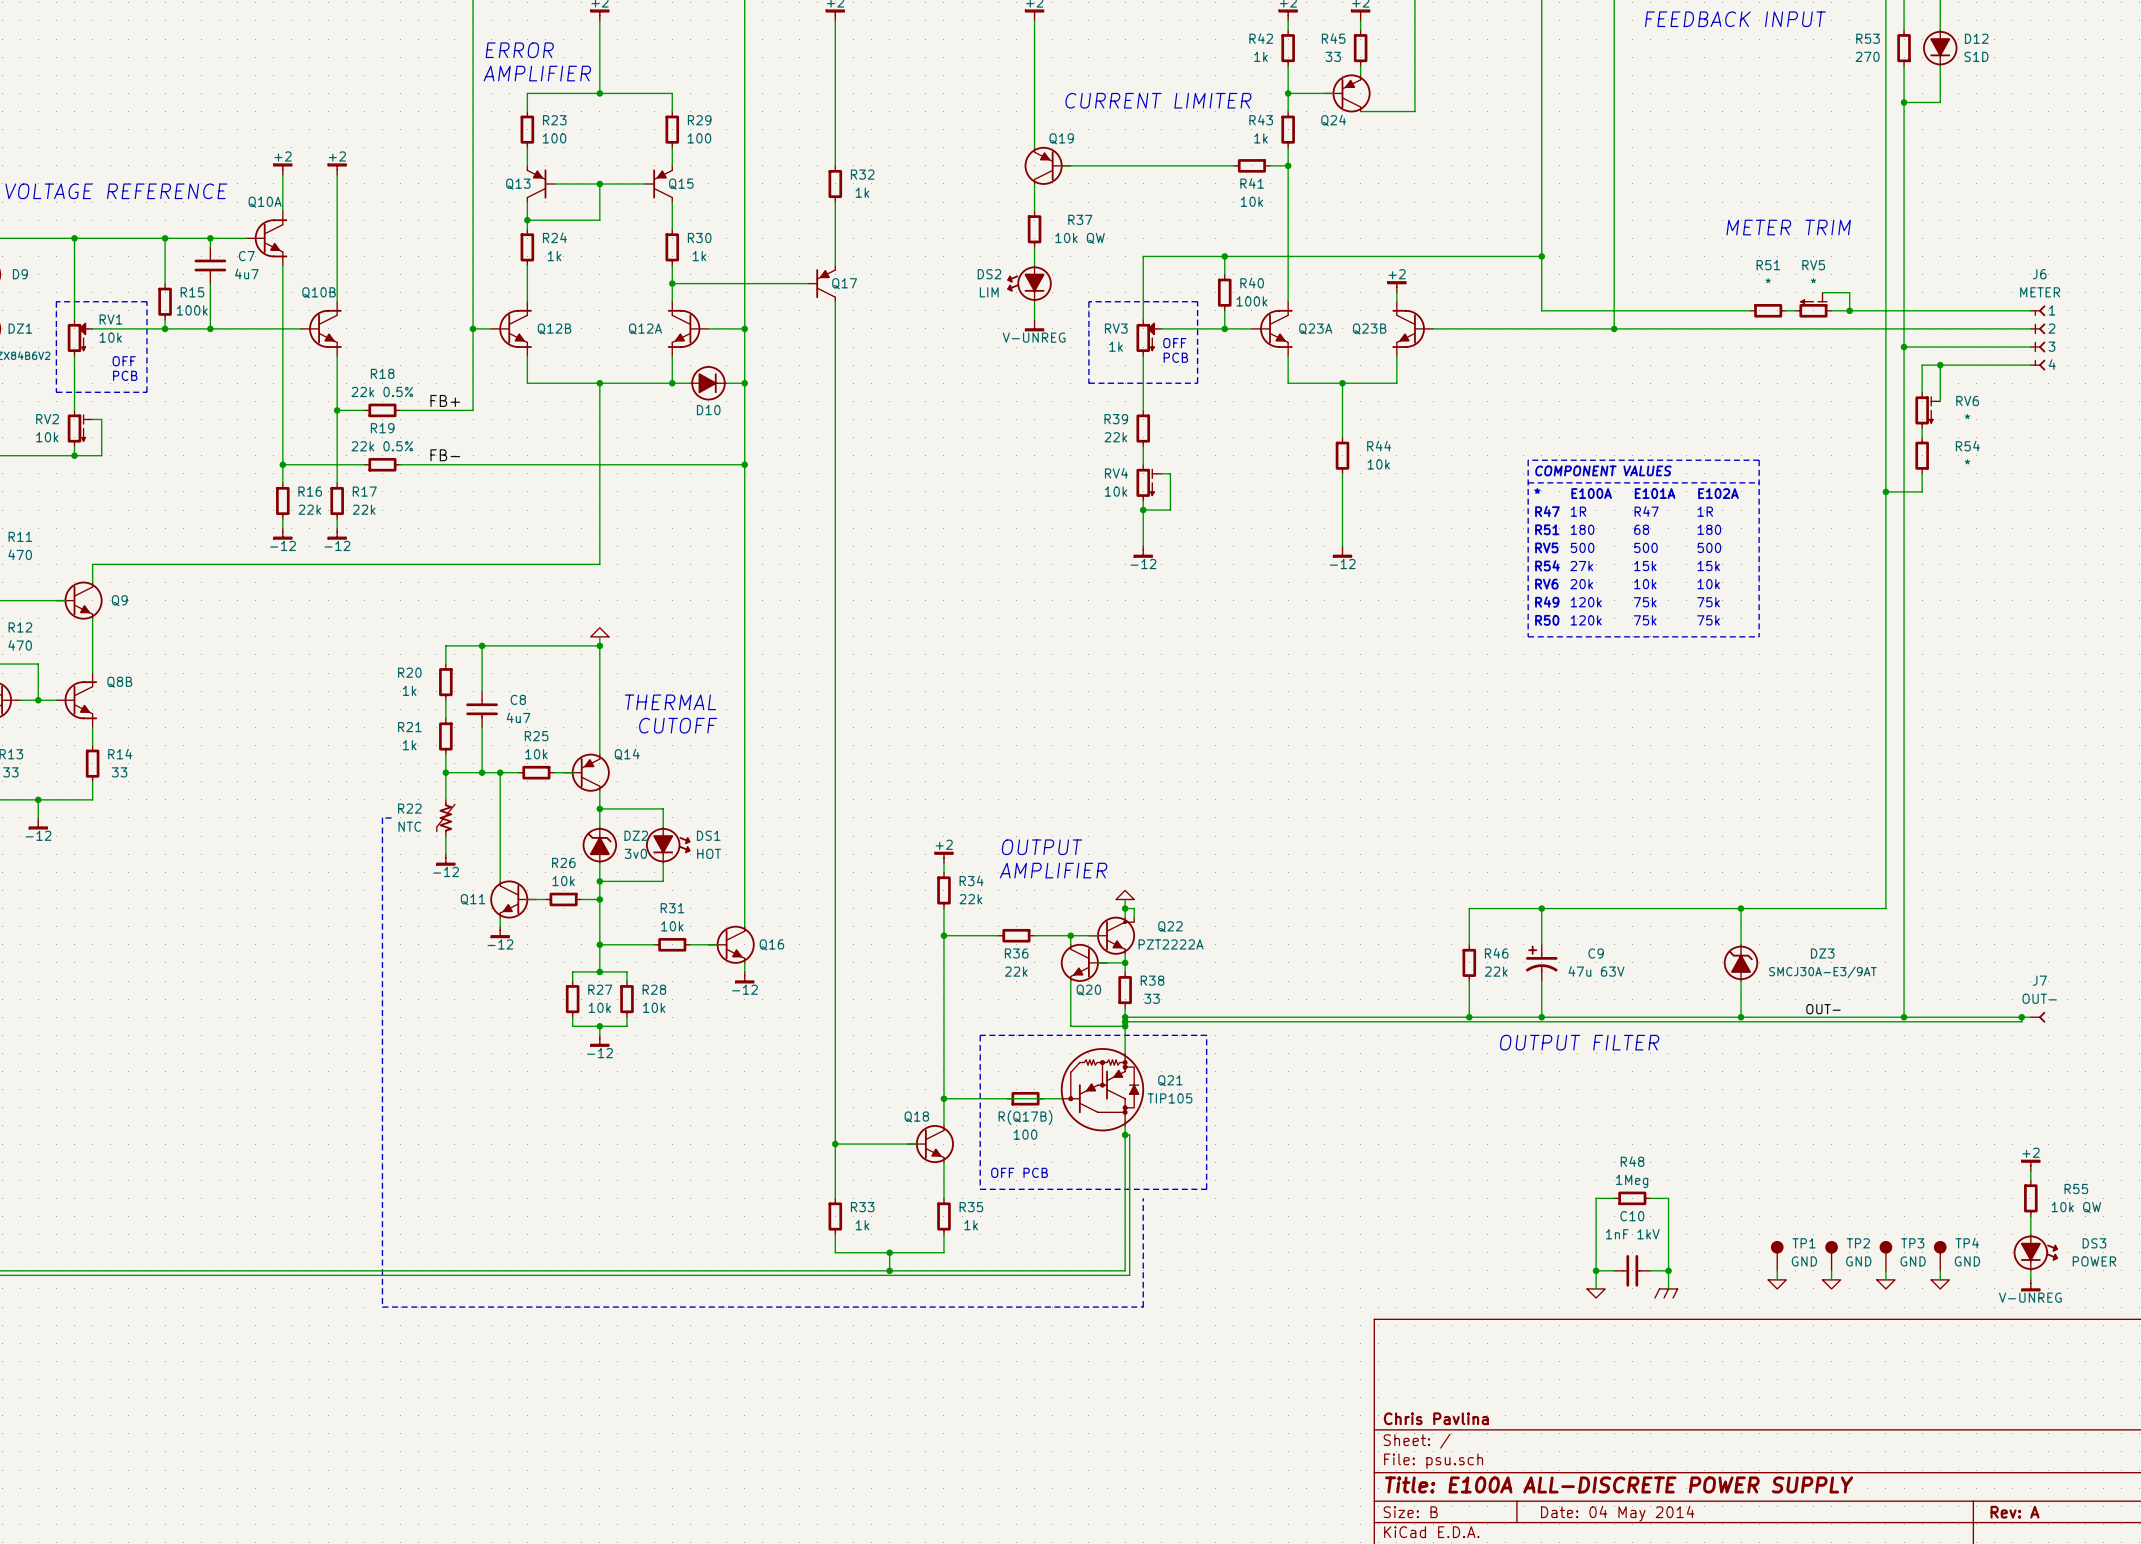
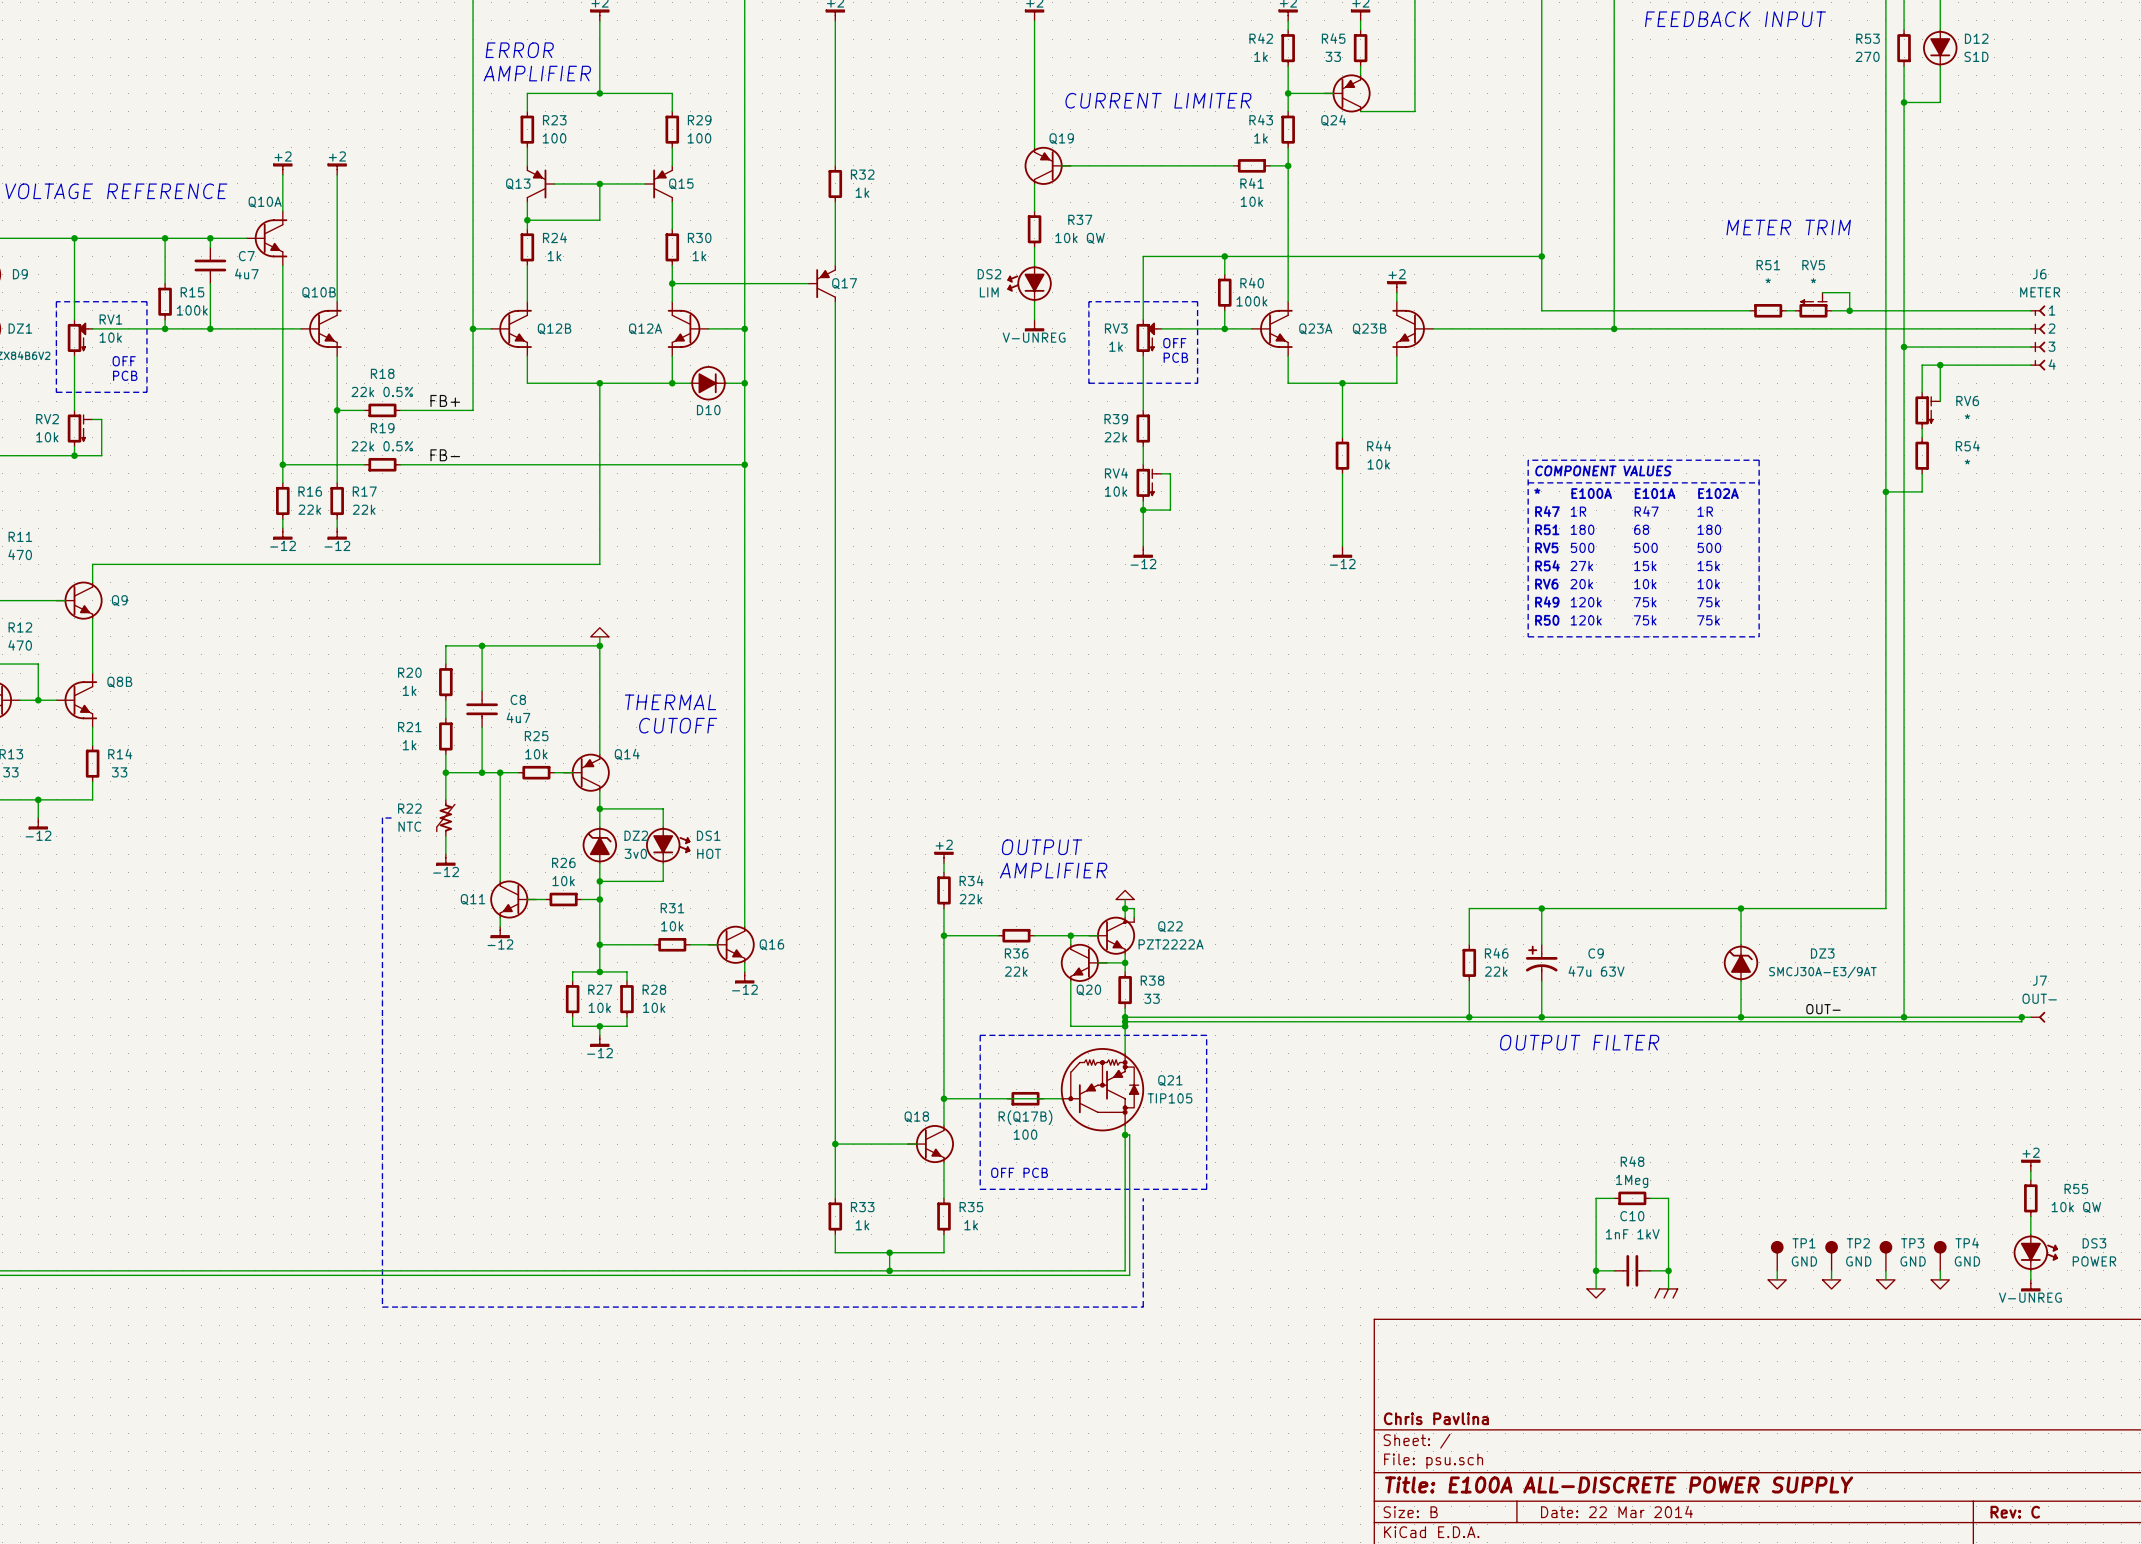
title block: Rev: A (2015, 1512) -> Rev: C (2015, 1512)
title block: Date: 04 May 2014 (1617, 1513) -> Date: 22 Mar 2014 (1616, 1511)

